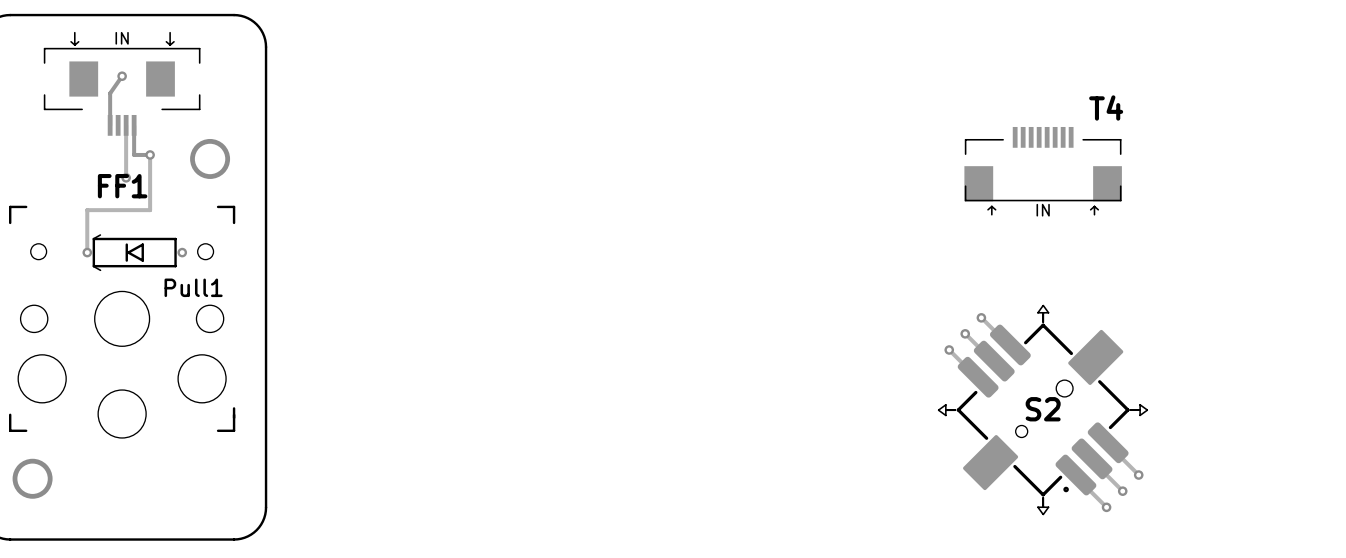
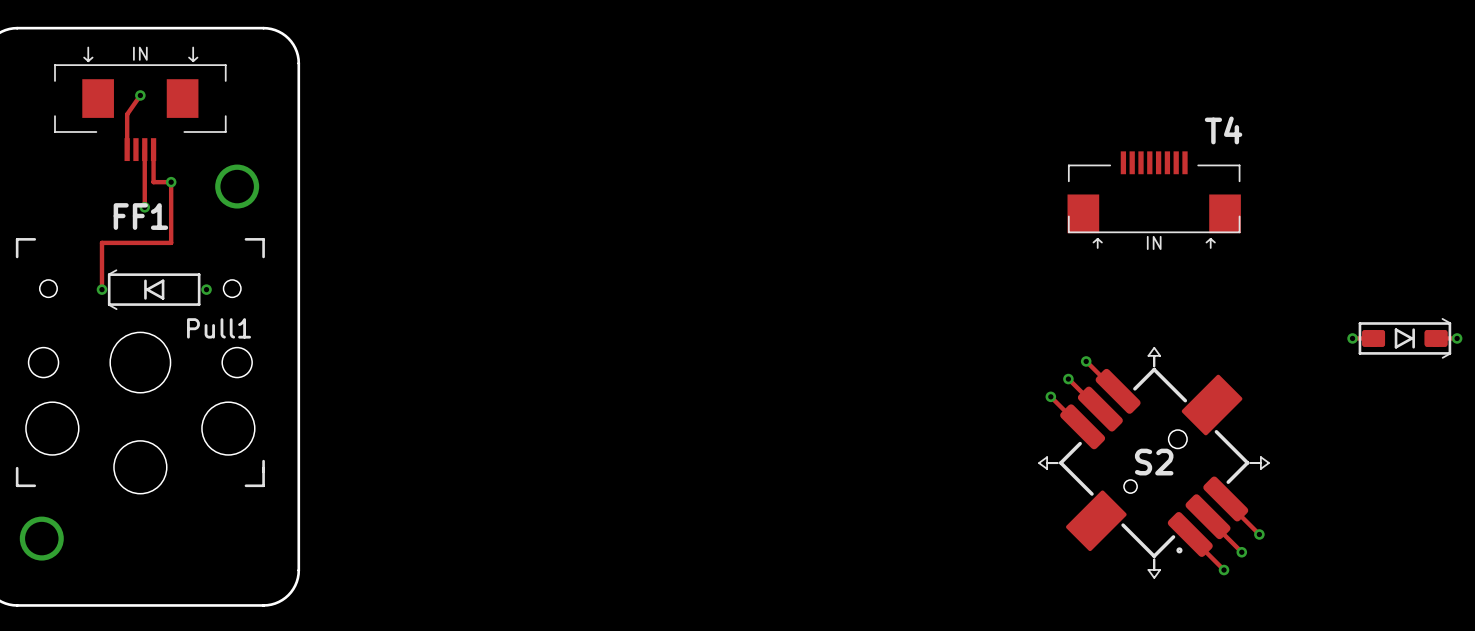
part: none -> (1404, 338)

